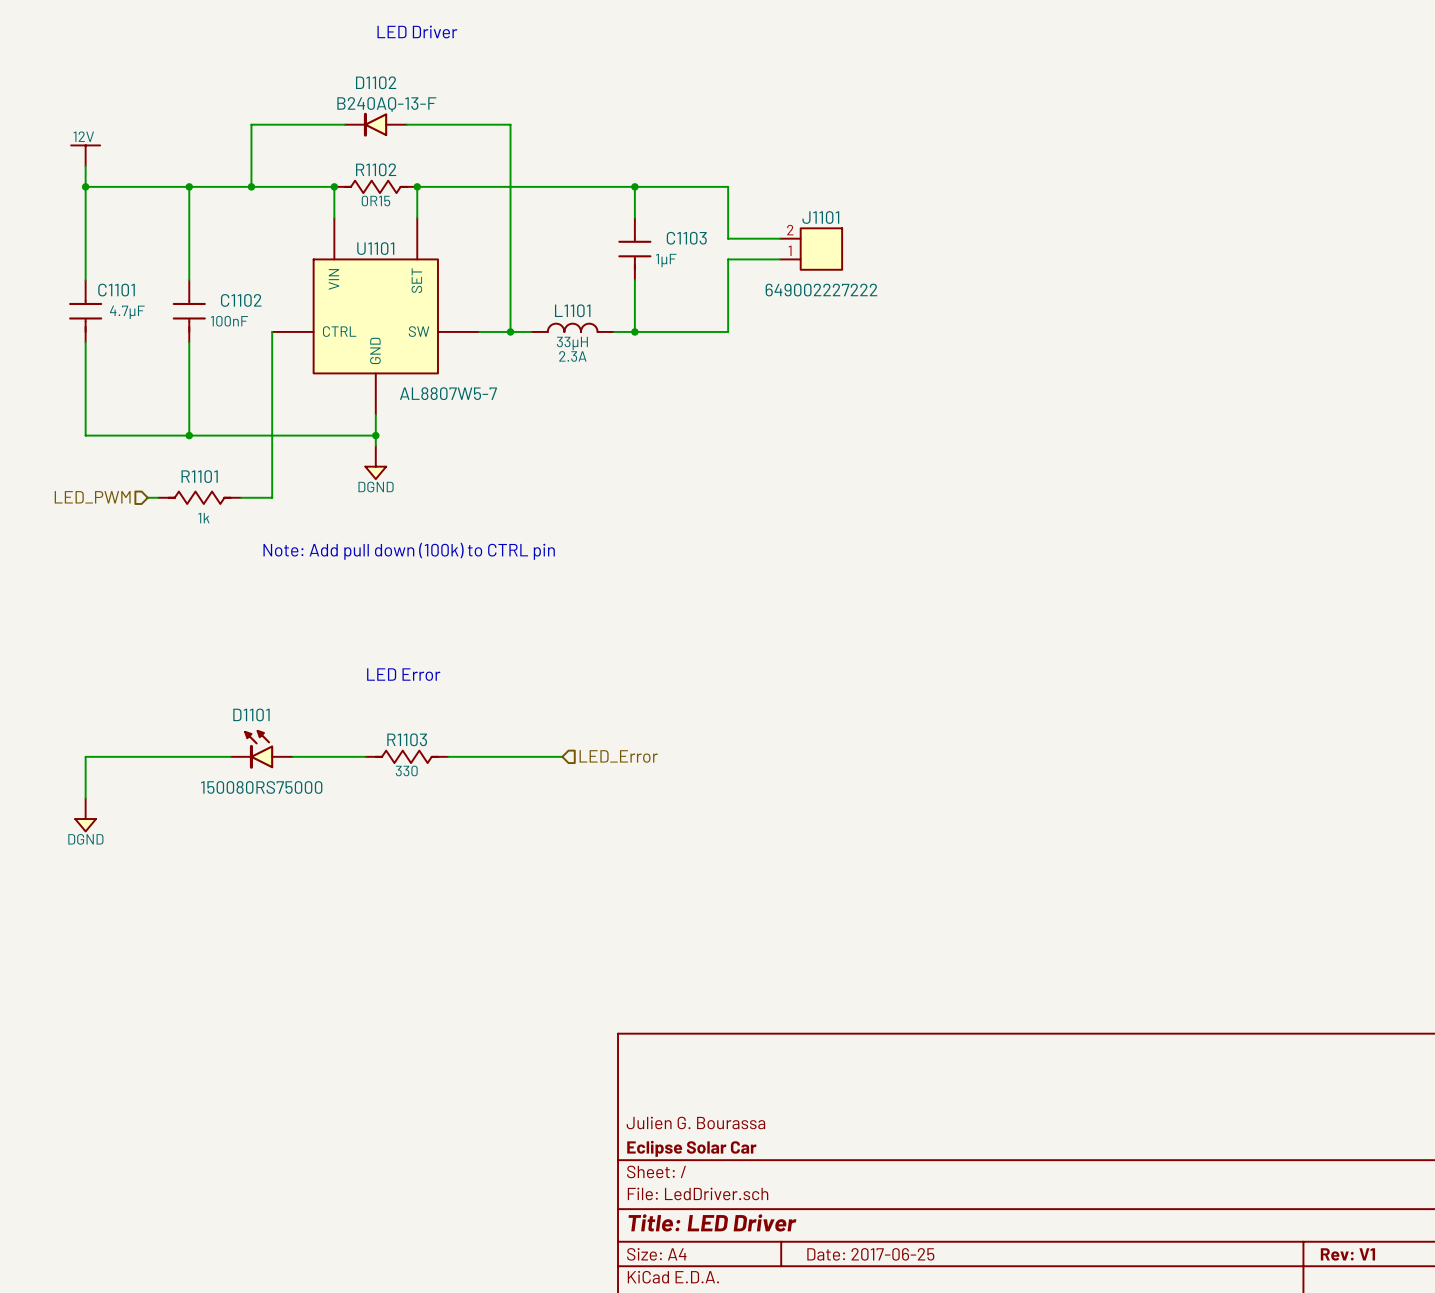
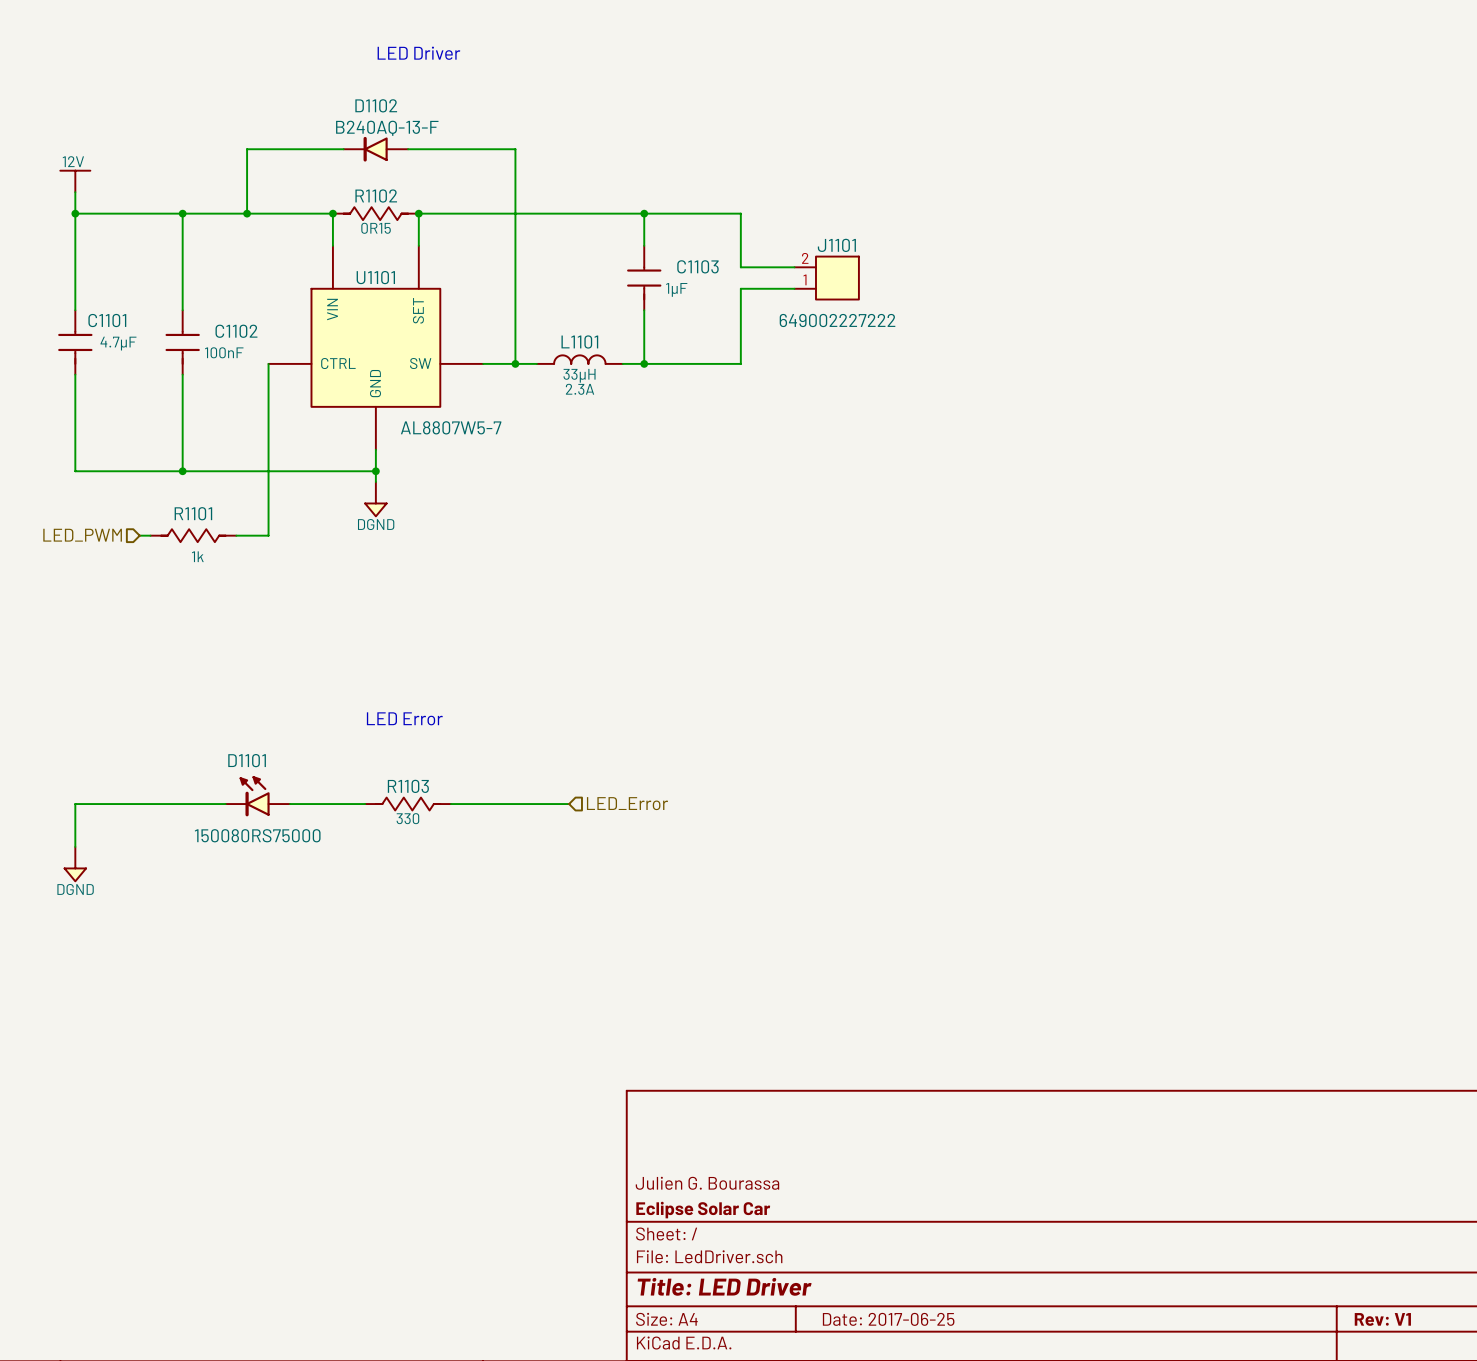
text: Note: Add pull down (100k) to CTRL pin (409, 551) -> none

